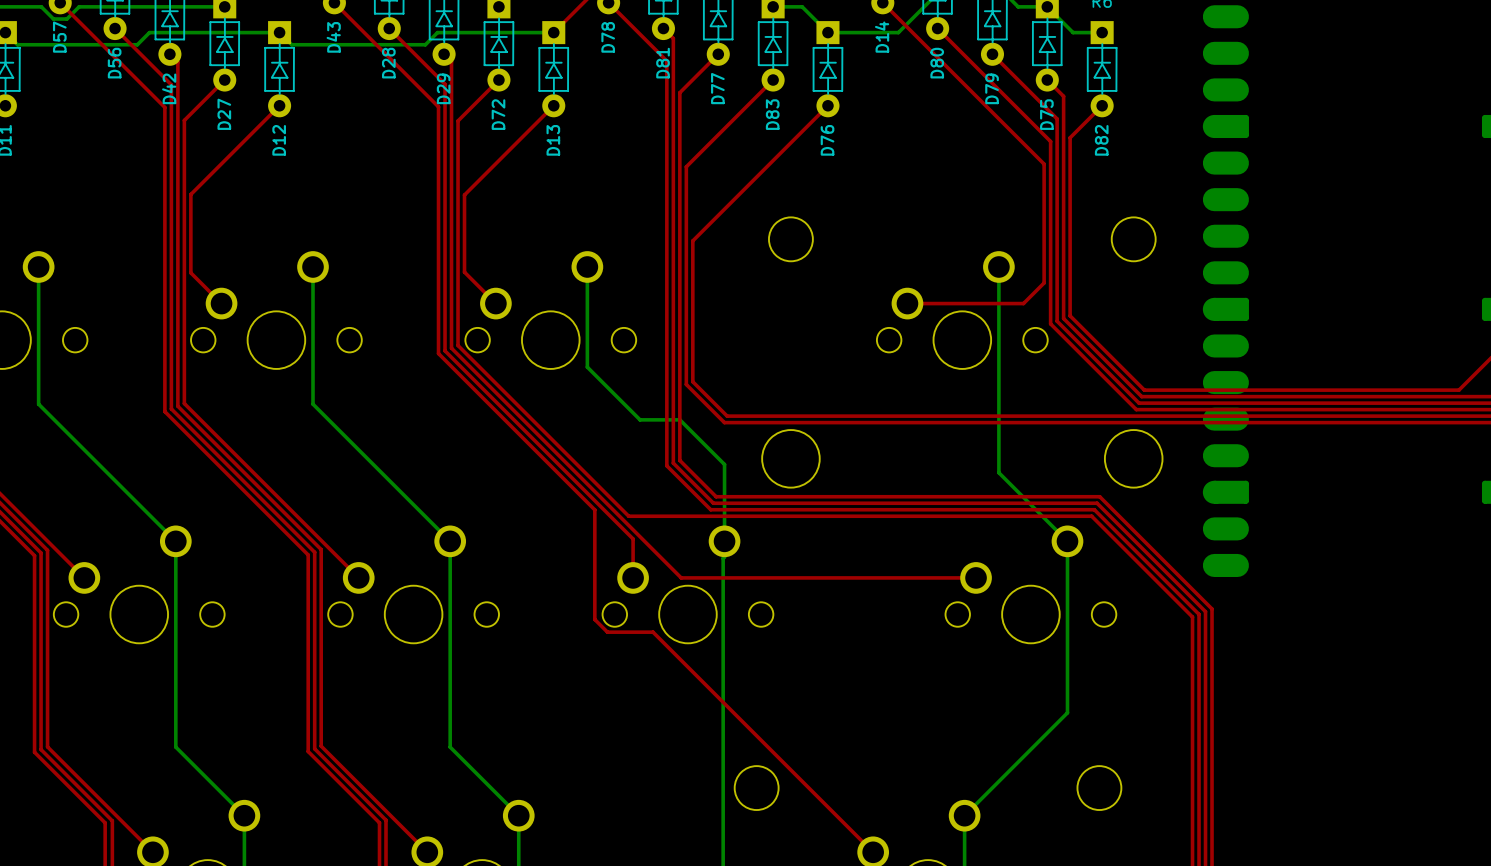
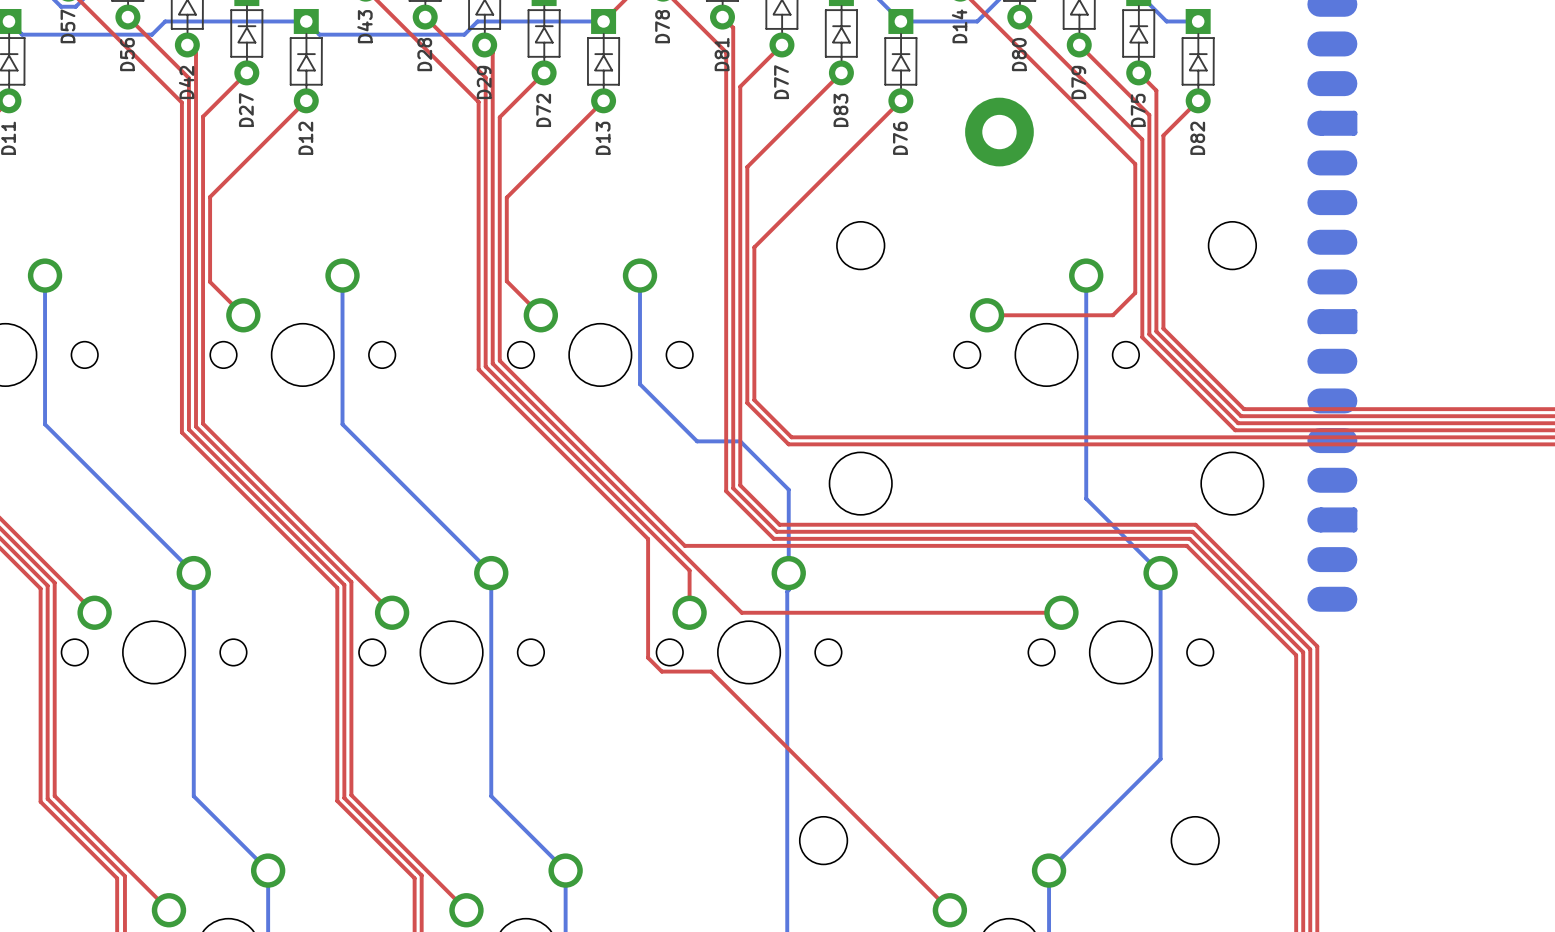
part: none -> (999, 132)

